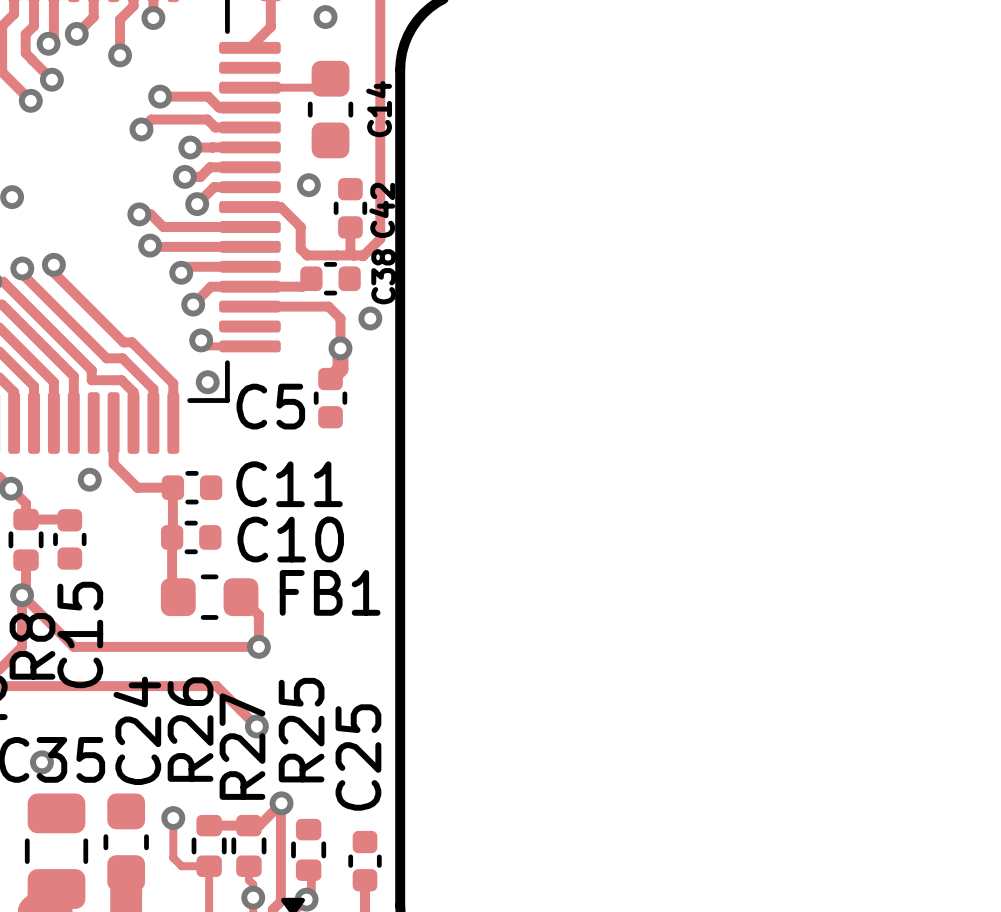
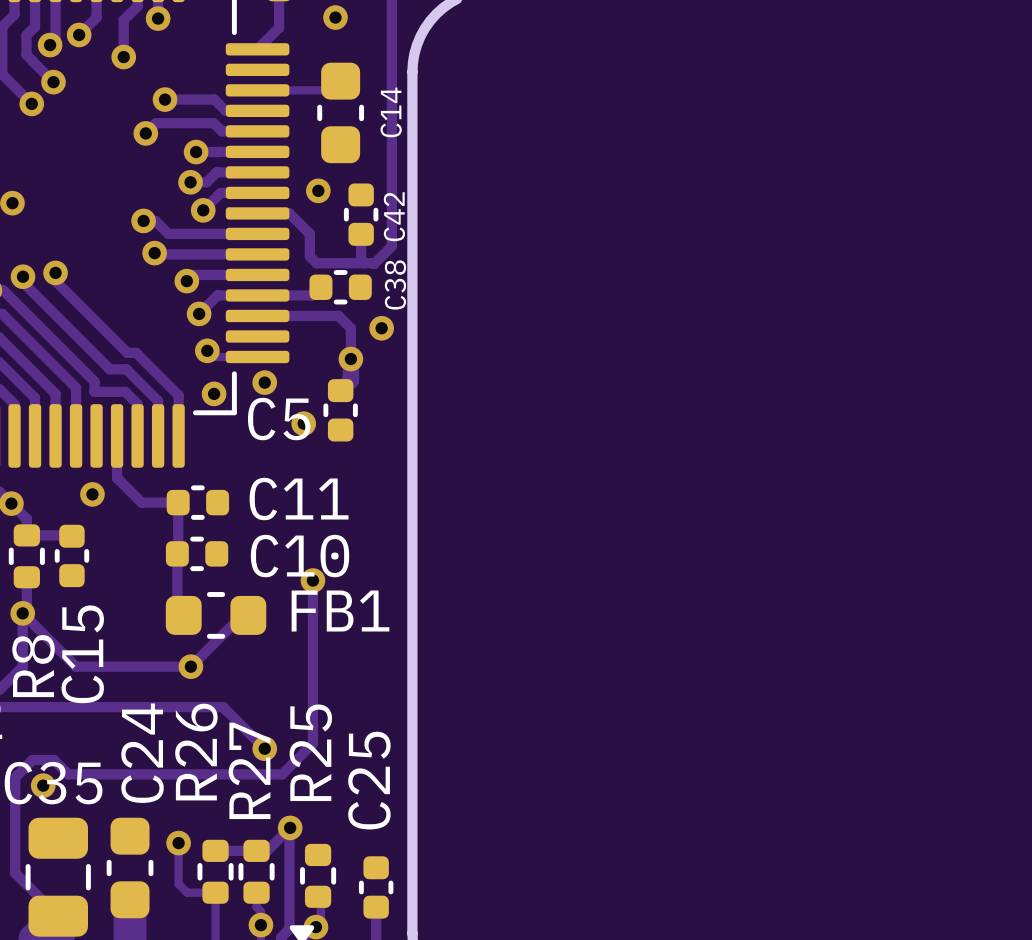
via: none -> (264, 382)
via: none -> (303, 423)
track: none -> (312, 580) (312, 743) (282, 774) (68, 774) (53, 760) (32, 760) (15, 777) (15, 873) (58, 916)
via: none -> (312, 580)
track: (240, 597) (258, 615) (258, 646) (185, 646) -> (248, 615) (242, 615) (190, 666)
via: none -> (190, 666)
via: (258, 646) -> none

